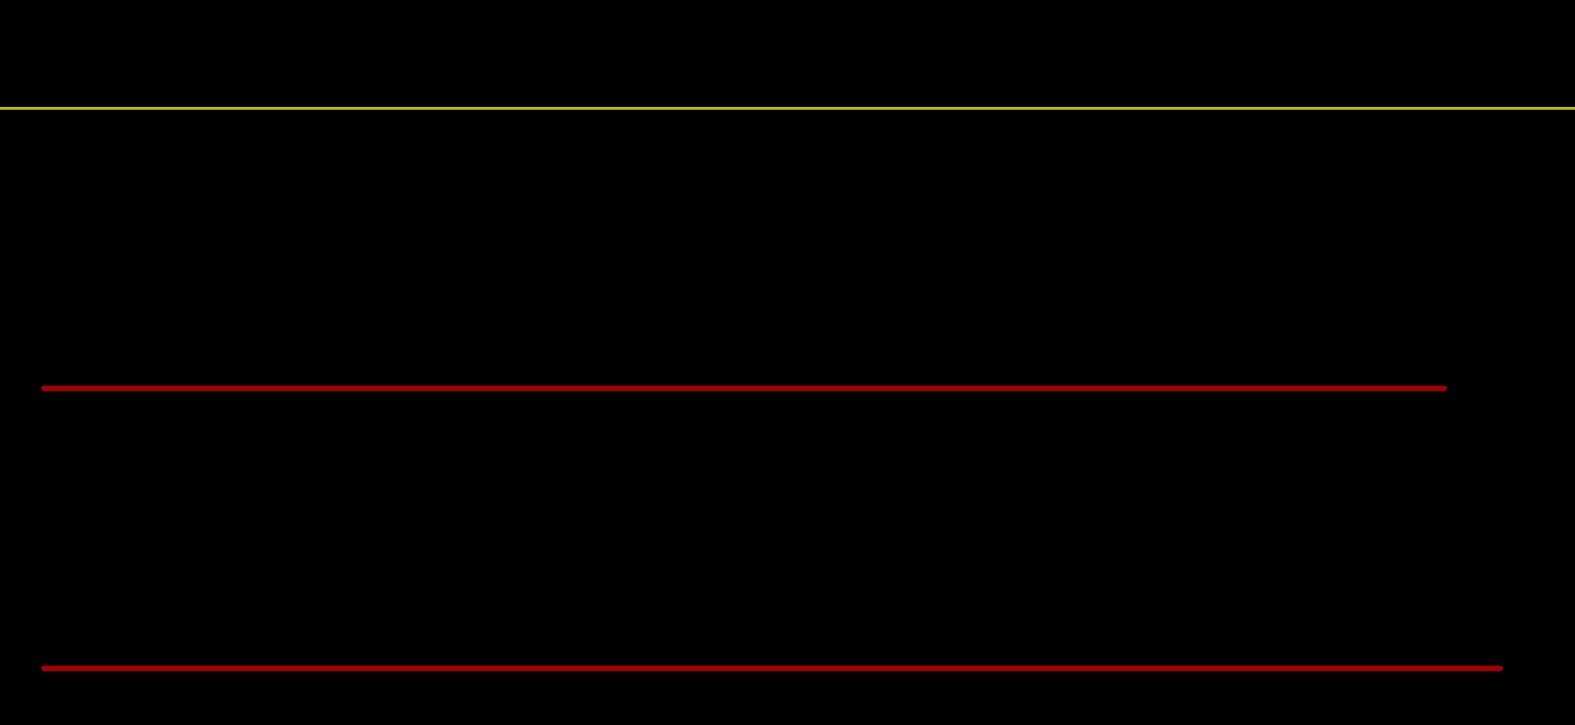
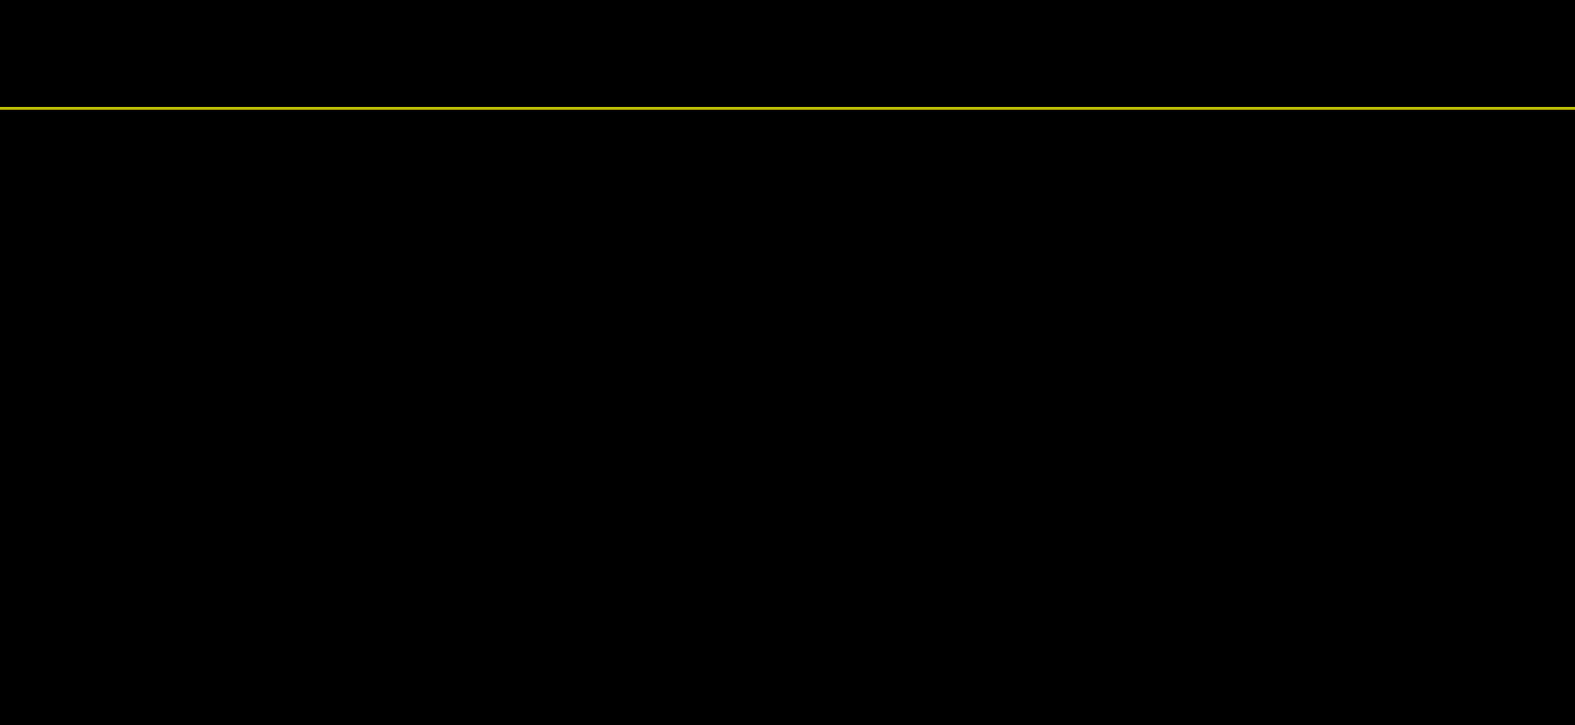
track: (43, 388) (1444, 388) -> none
track: (43, 668) (1500, 668) -> none

